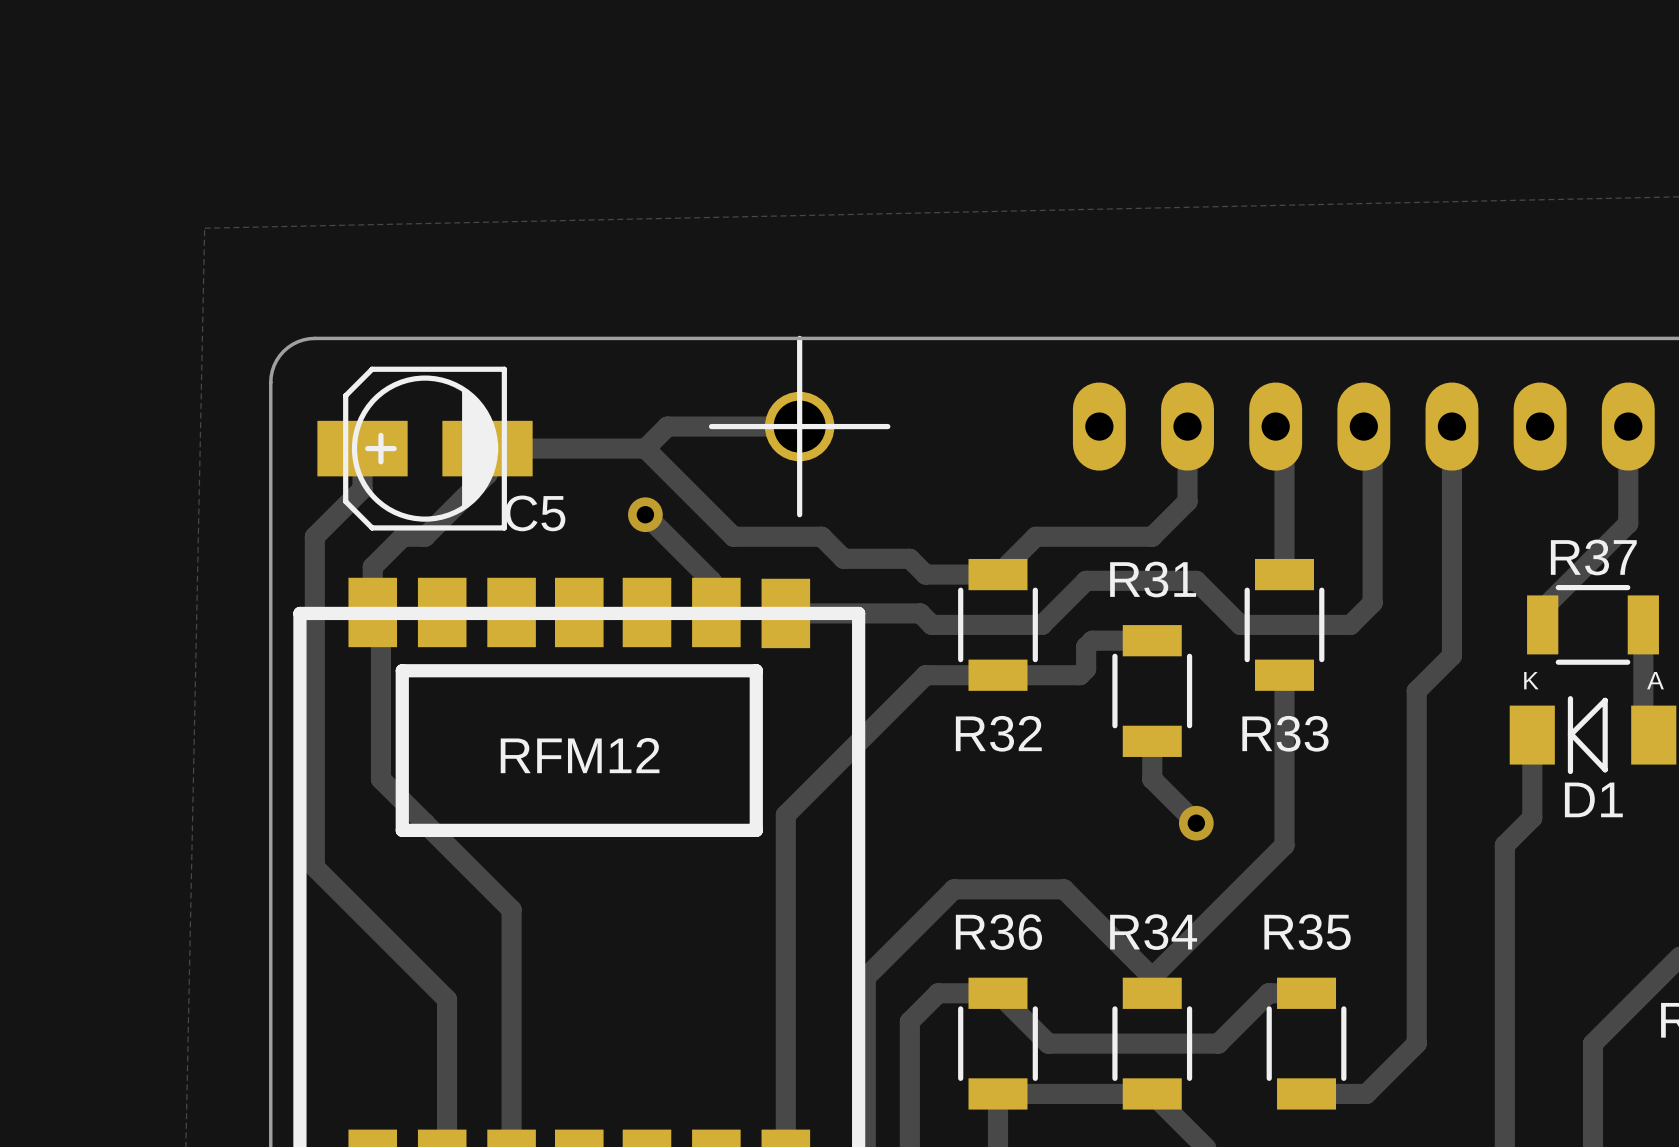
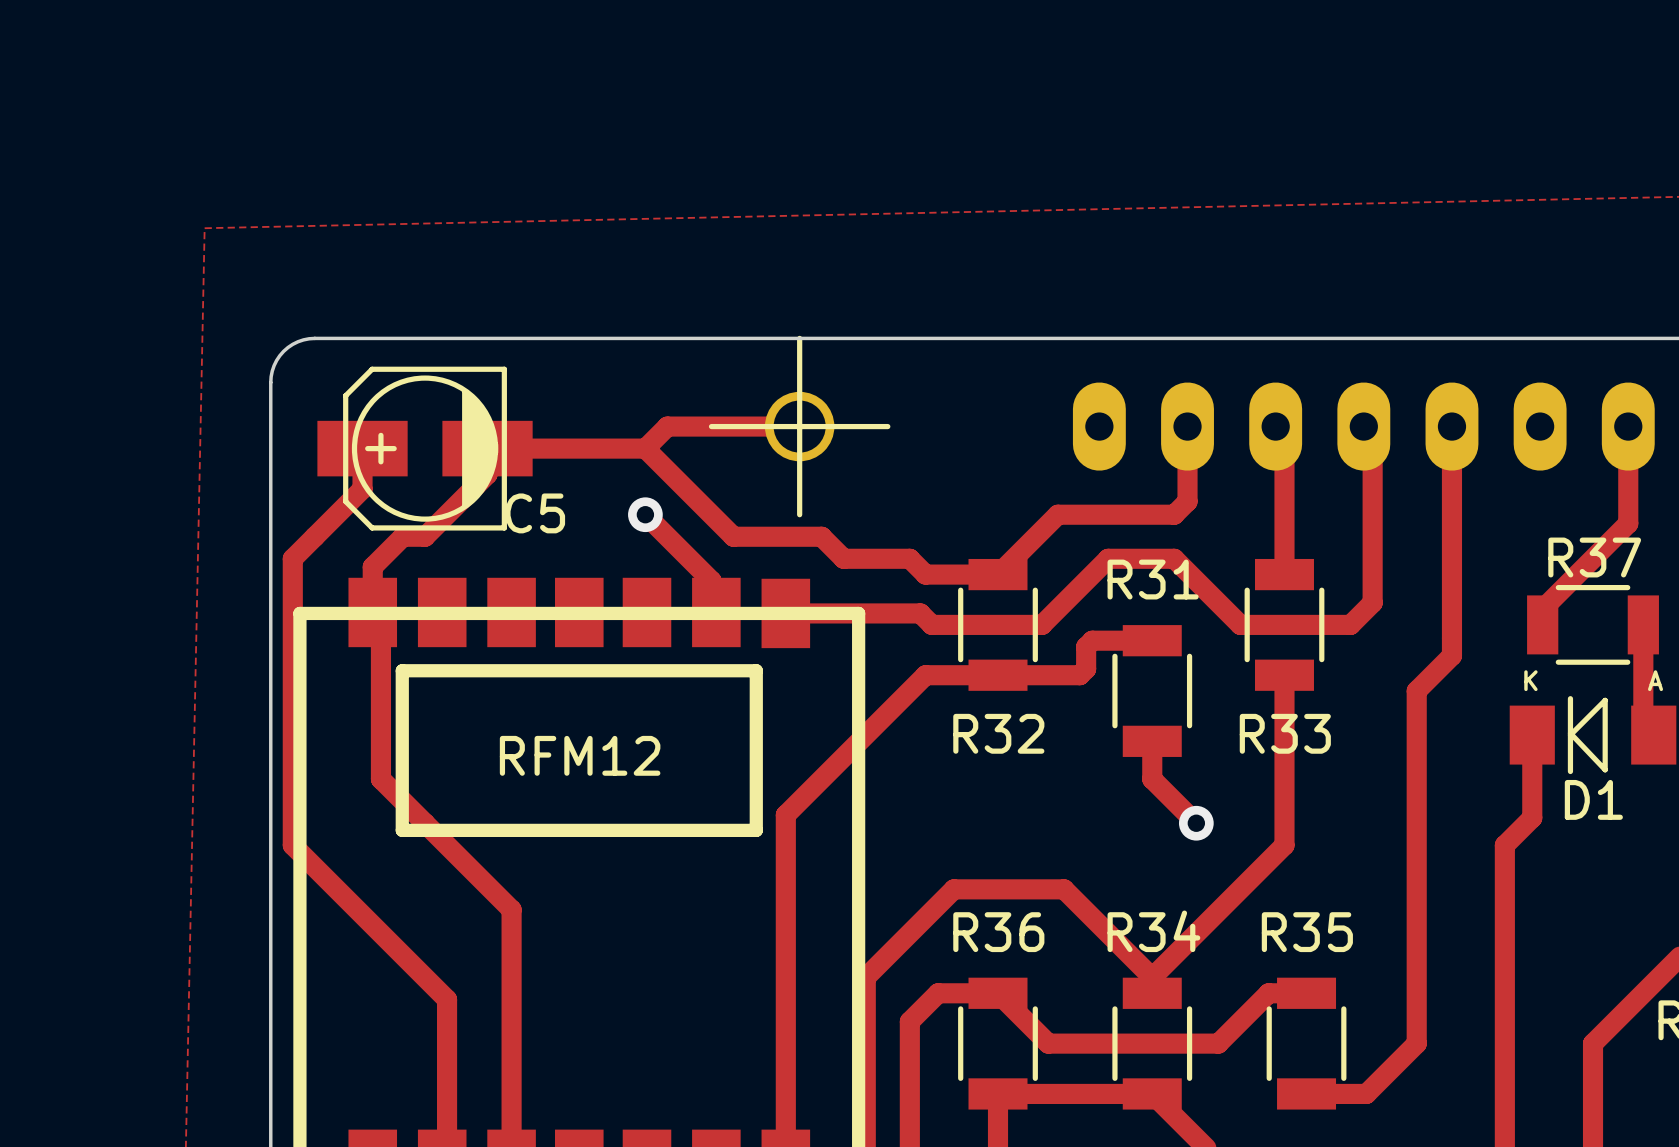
track: (1174, 514) (1152, 536) (1035, 536) -> (1174, 514) (1057, 514) (1035, 536)
track: (314, 536) (314, 867) -> (314, 536) (292, 558) (292, 845) (314, 867)
track: (1086, 580) (1196, 580) -> (1086, 580) (1108, 558) (1174, 558) (1196, 580)

